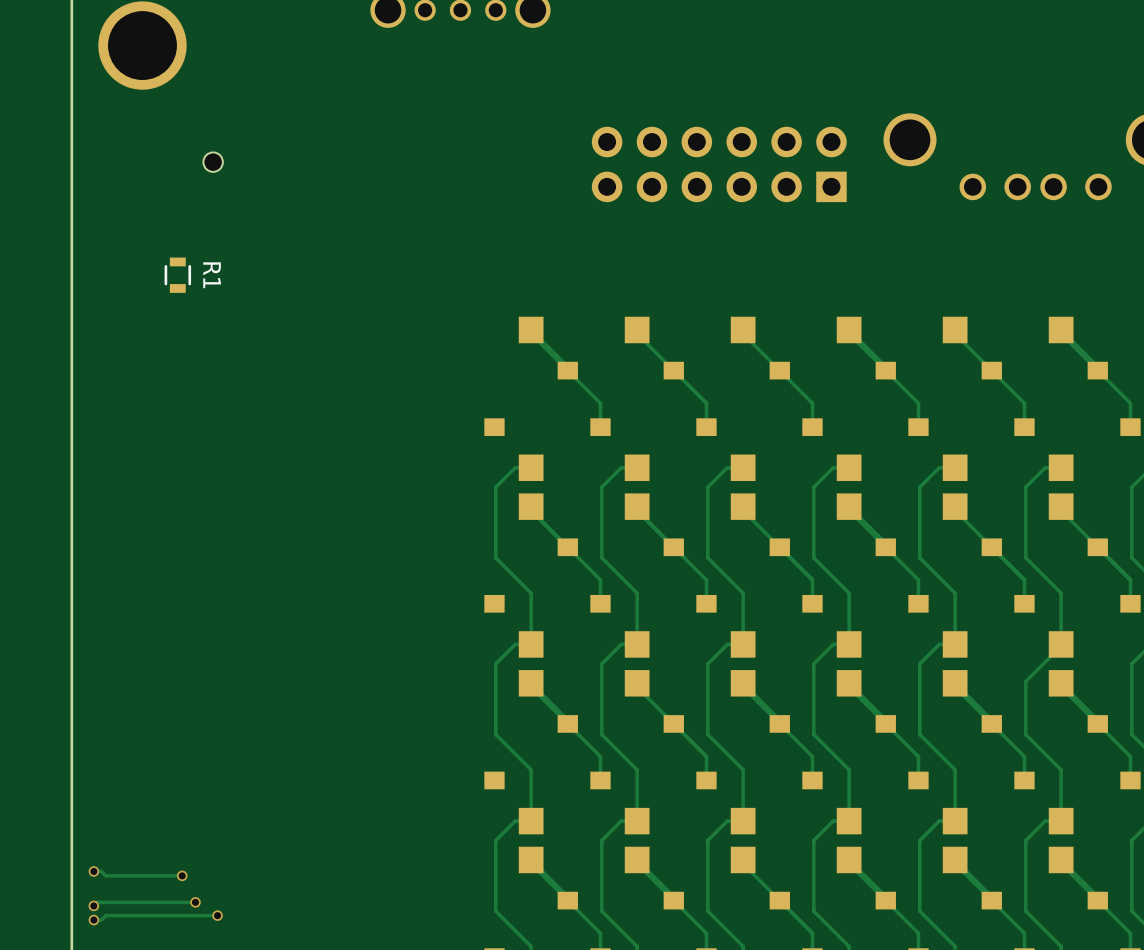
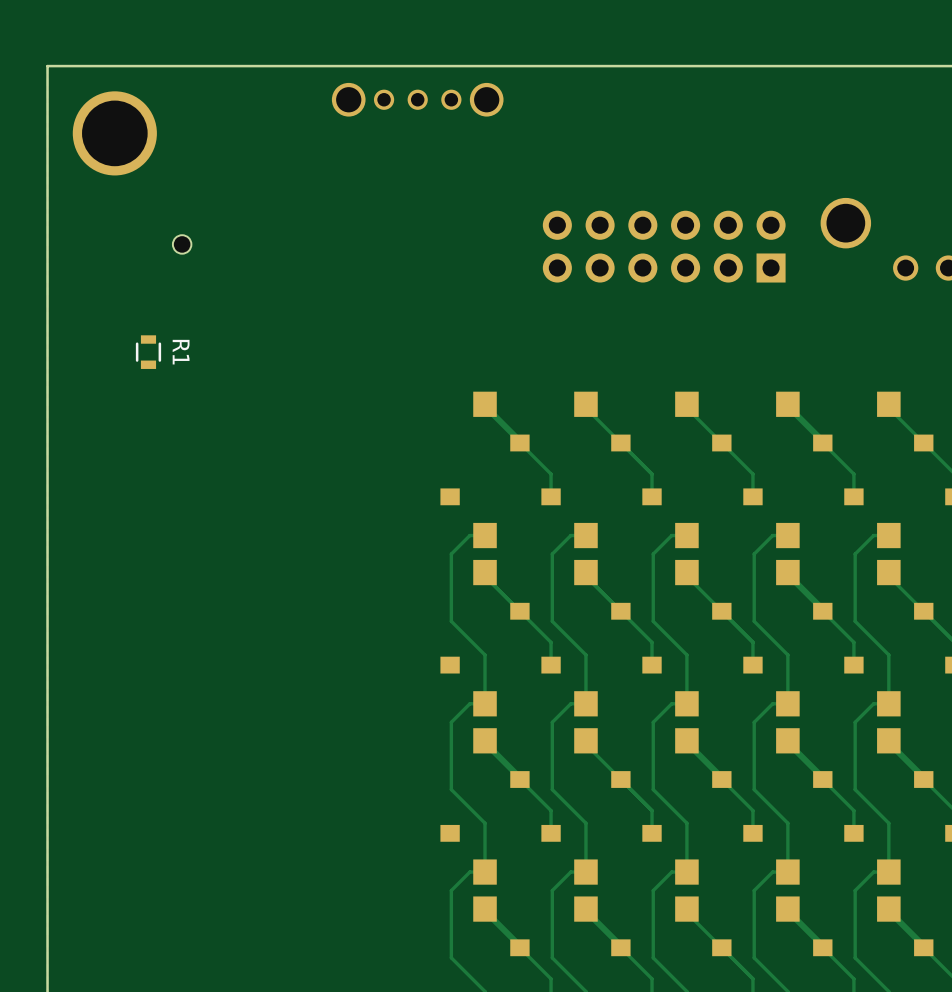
track: (93, 871) (101, 871) (105, 875) (182, 875) -> none
via: (93, 871) -> none
via: (182, 875) -> none
track: (195, 902) (97, 902) (93, 905) -> none
via: (195, 902) -> none
via: (93, 905) -> none
track: (217, 915) (105, 915) (101, 920) (93, 920) -> none
via: (217, 915) -> none
via: (93, 920) -> none

